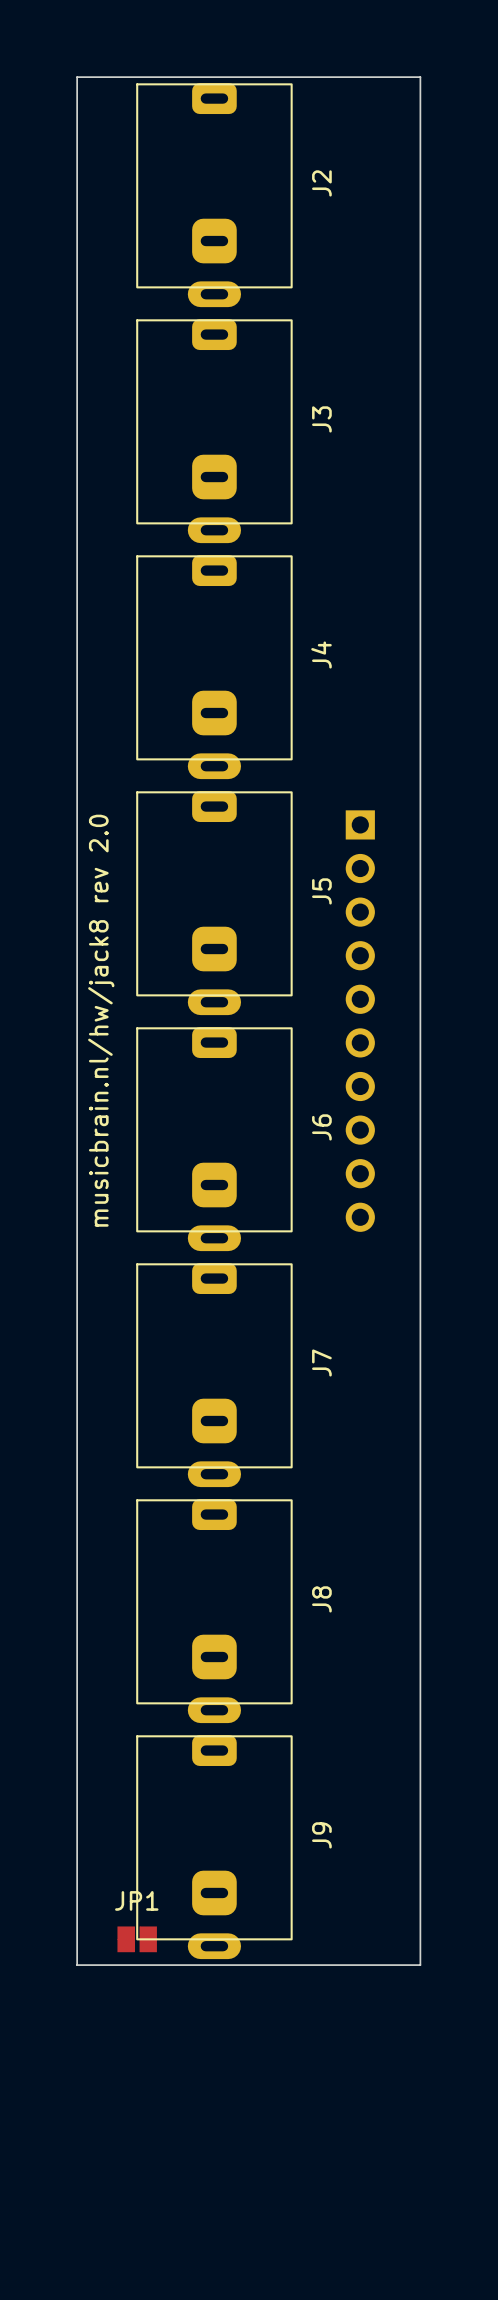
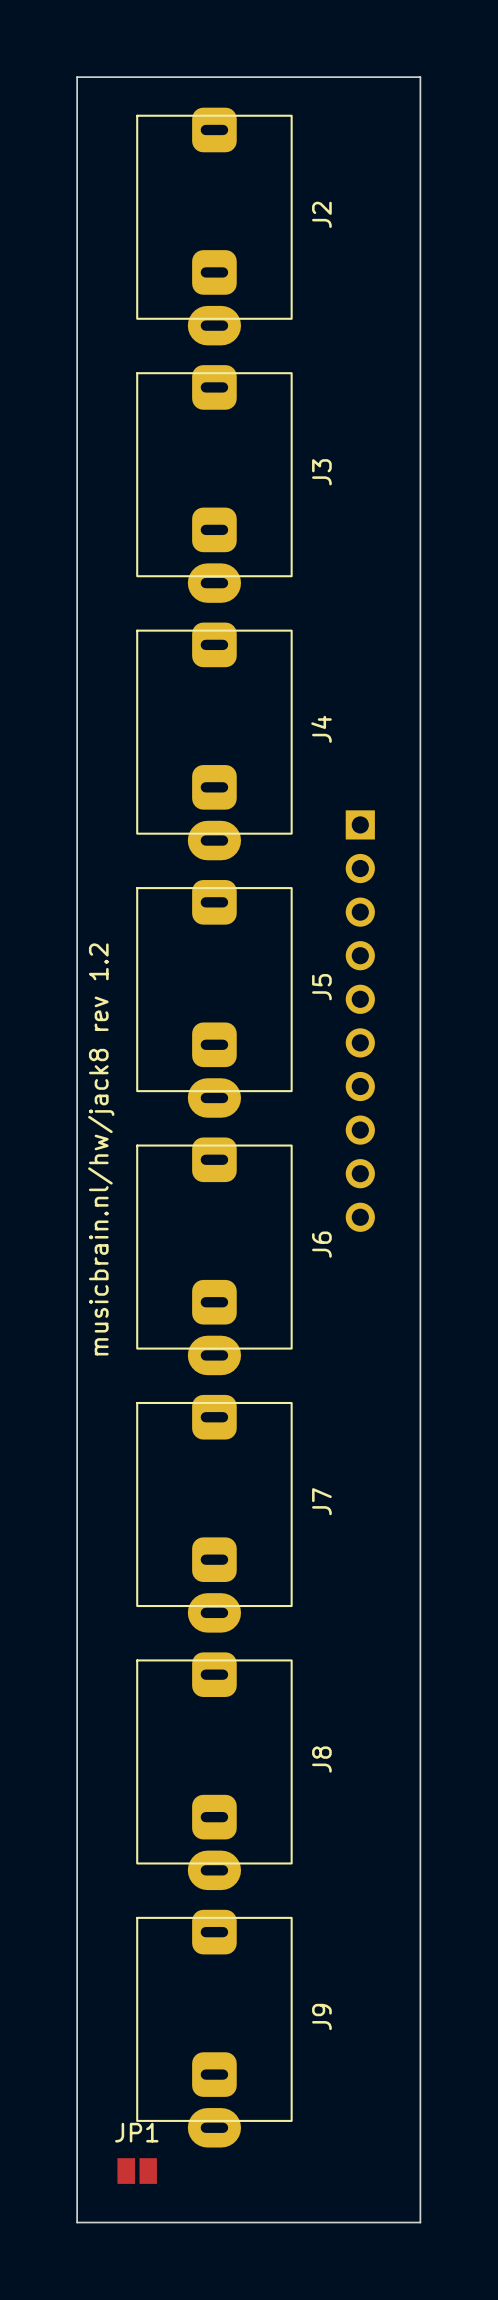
J2 footprint: [136, 83, 293, 308] -> [136, 107, 293, 346]
J3 footprint: [136, 319, 293, 544] -> [136, 365, 293, 603]
J4 footprint: [136, 555, 293, 780] -> [136, 622, 293, 861]
J5 footprint: [136, 791, 293, 1016] -> [136, 880, 293, 1118]
text: musicbrain.nl/hw/jack8 rev 2.0 (101, 1020) -> musicbrain.nl/hw/jack8 rev 1.2 (101, 1149)
J6 footprint: [136, 1027, 293, 1252] -> [136, 1137, 293, 1376]
J7 footprint: [136, 1263, 293, 1488] -> [136, 1394, 293, 1633]
J8 footprint: [136, 1499, 293, 1724] -> [136, 1652, 293, 1891]
J9 footprint: [136, 1735, 293, 1960] -> [136, 1909, 293, 2148]
JP1 position: (137, 1939) -> (137, 2171)
board edge: (77, 1965) (420, 1965) -> (77, 1965) (77, 2222) (420, 2222) (420, 1965)

